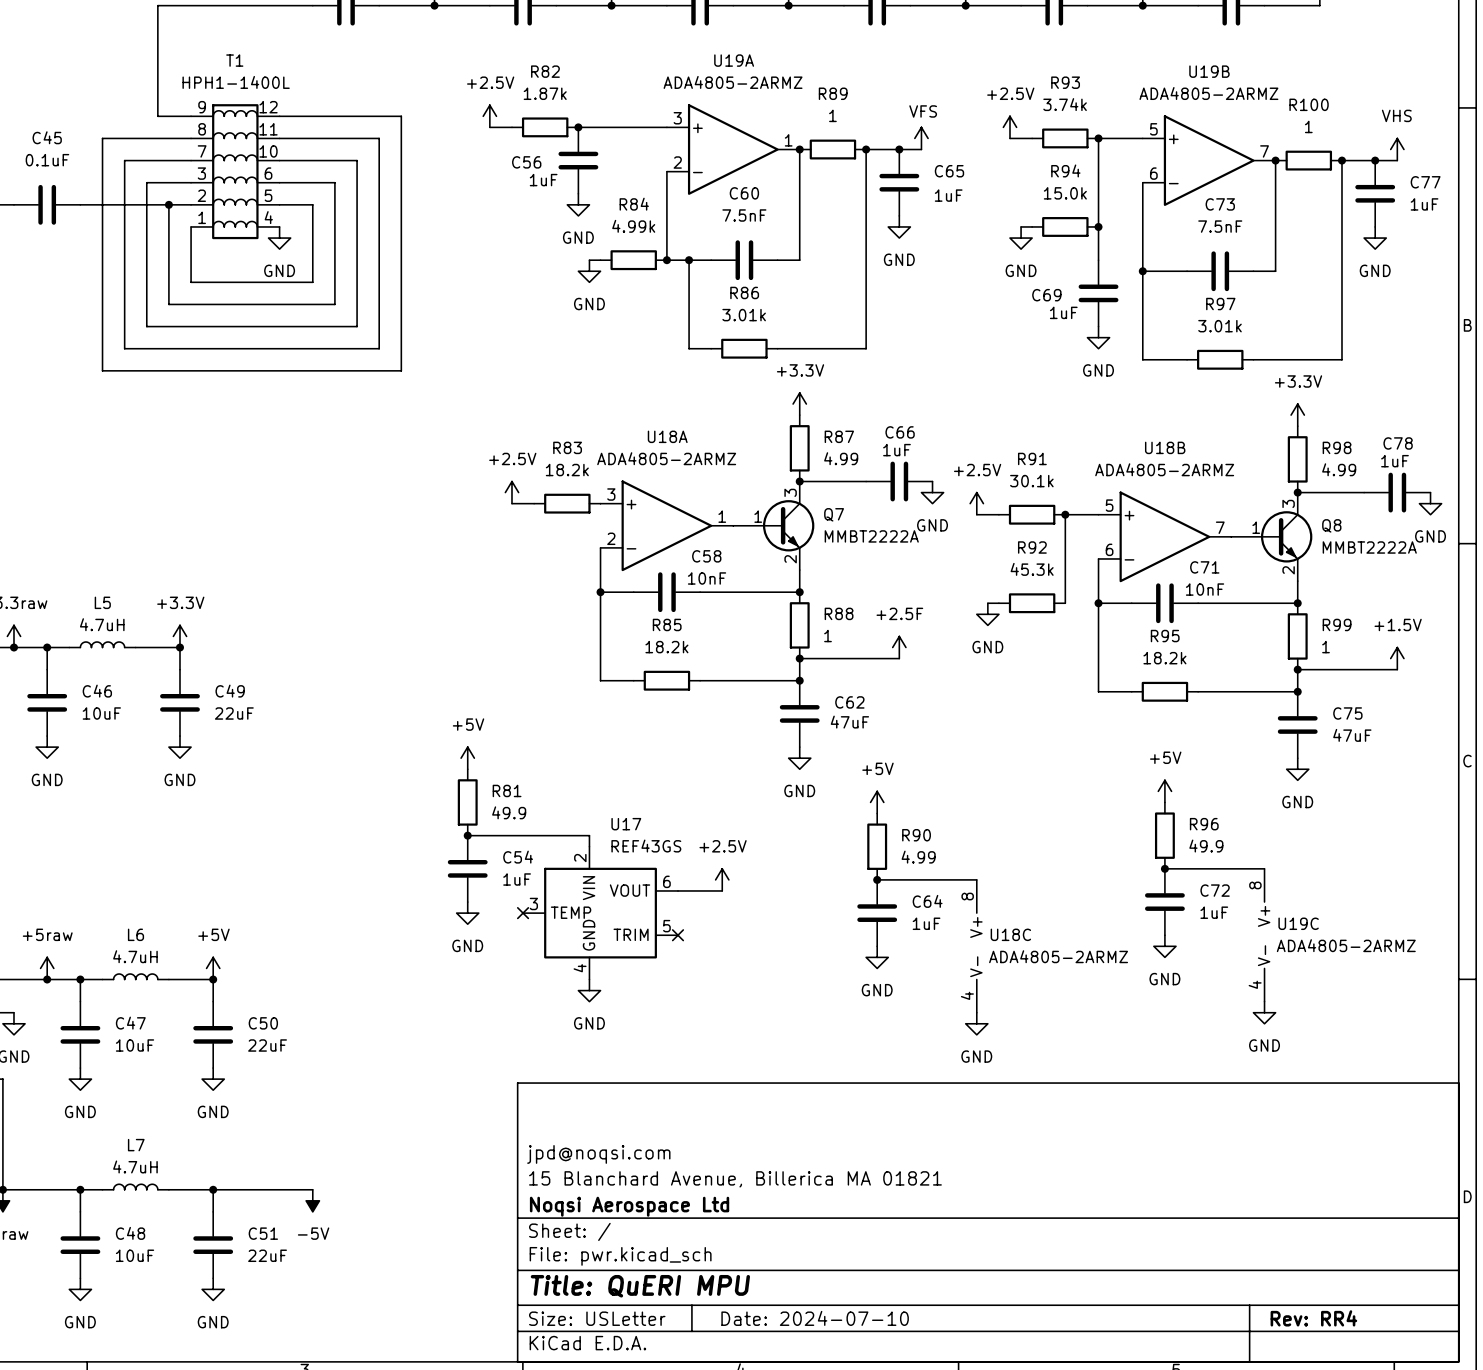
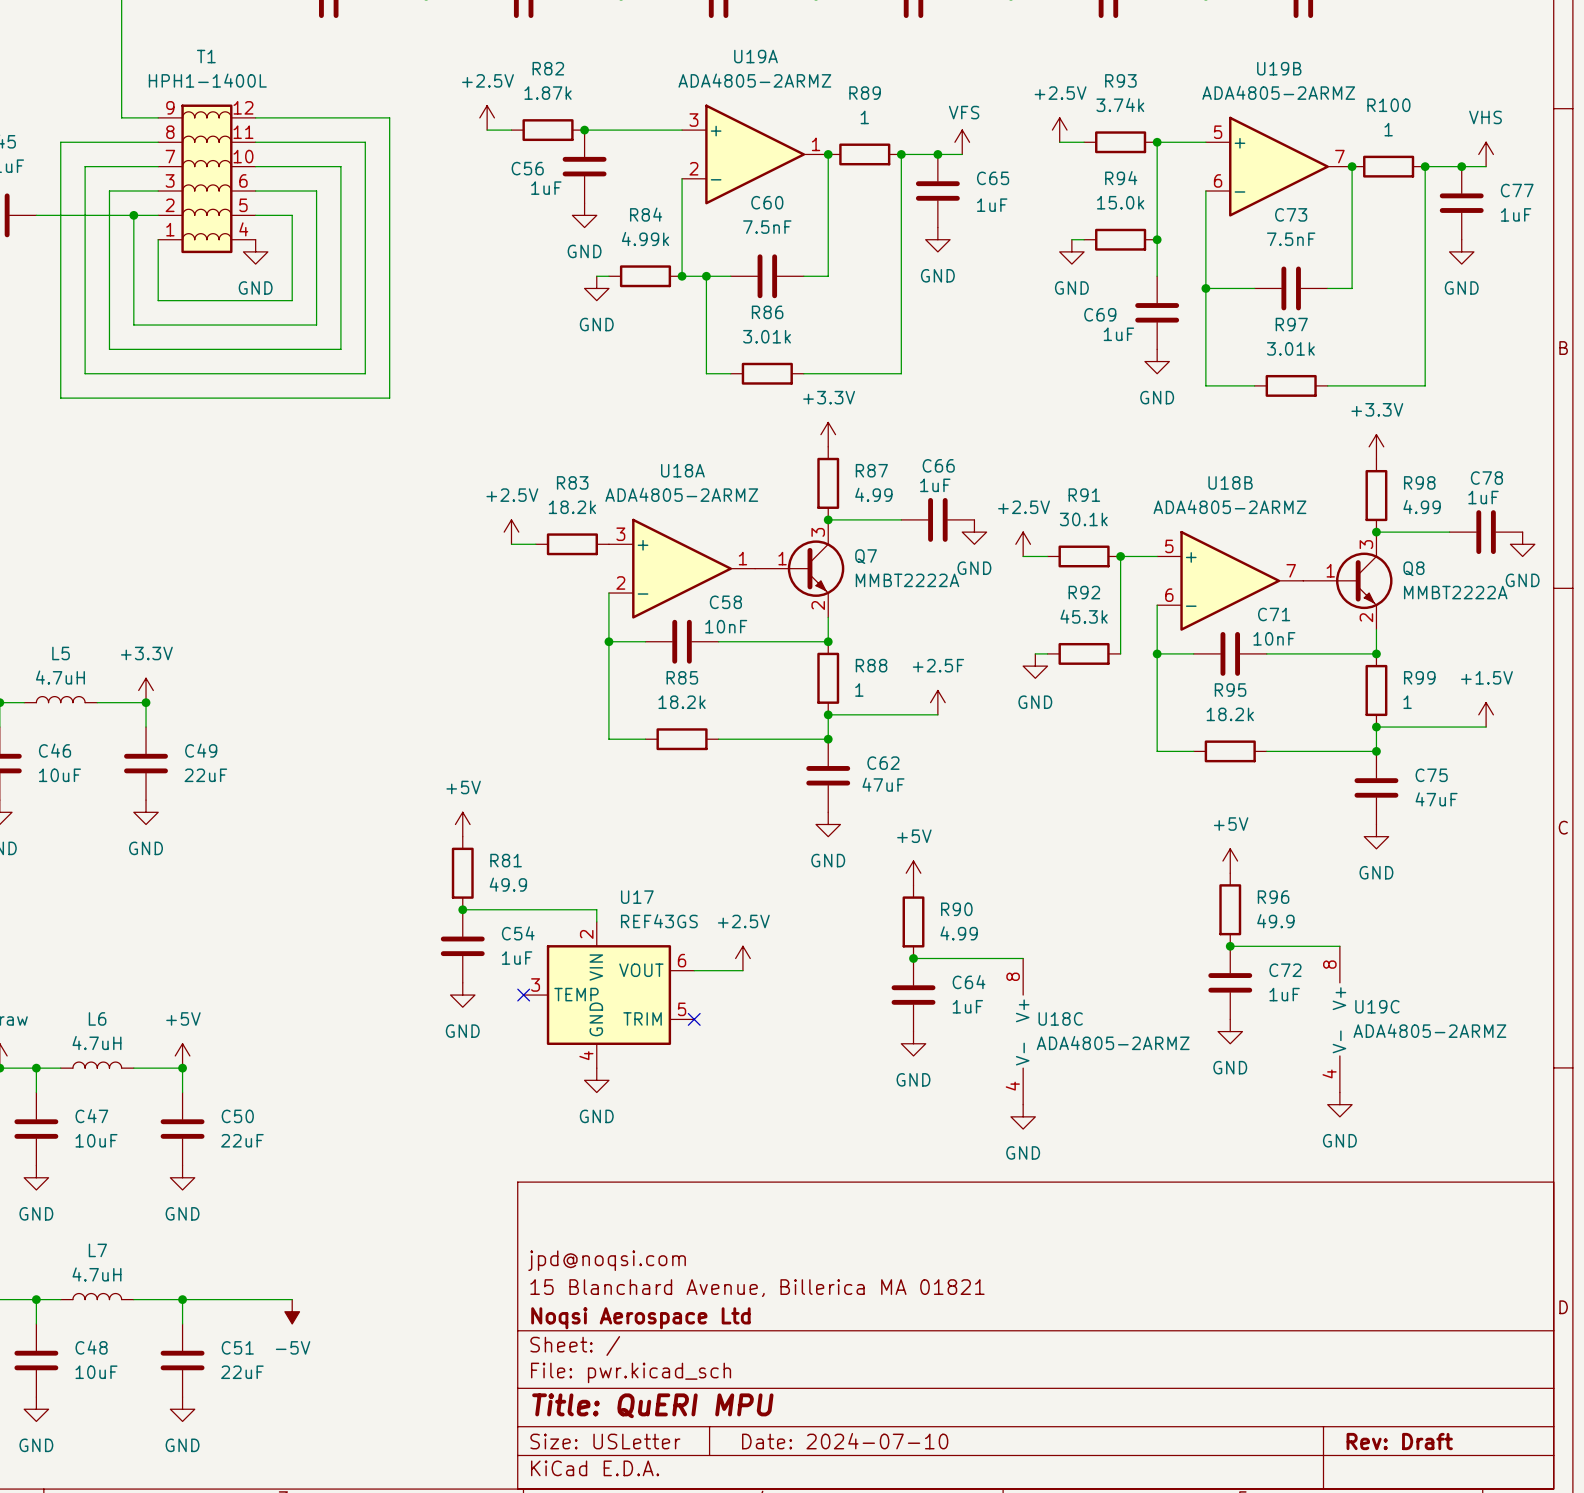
title block: Rev: RR4 (1313, 1318) -> Rev: Draft (1399, 1441)

